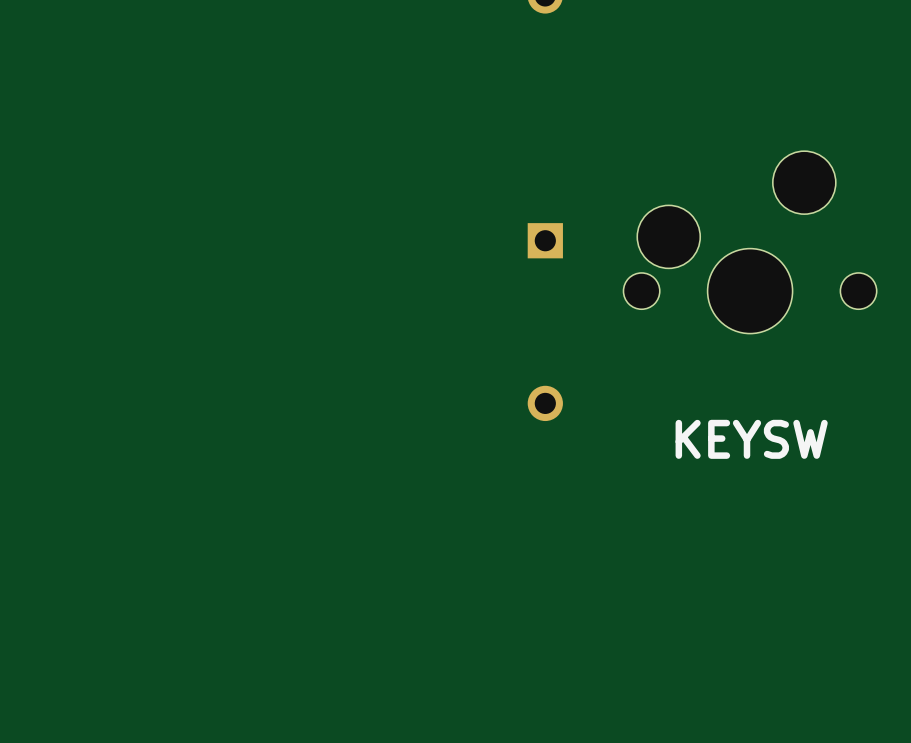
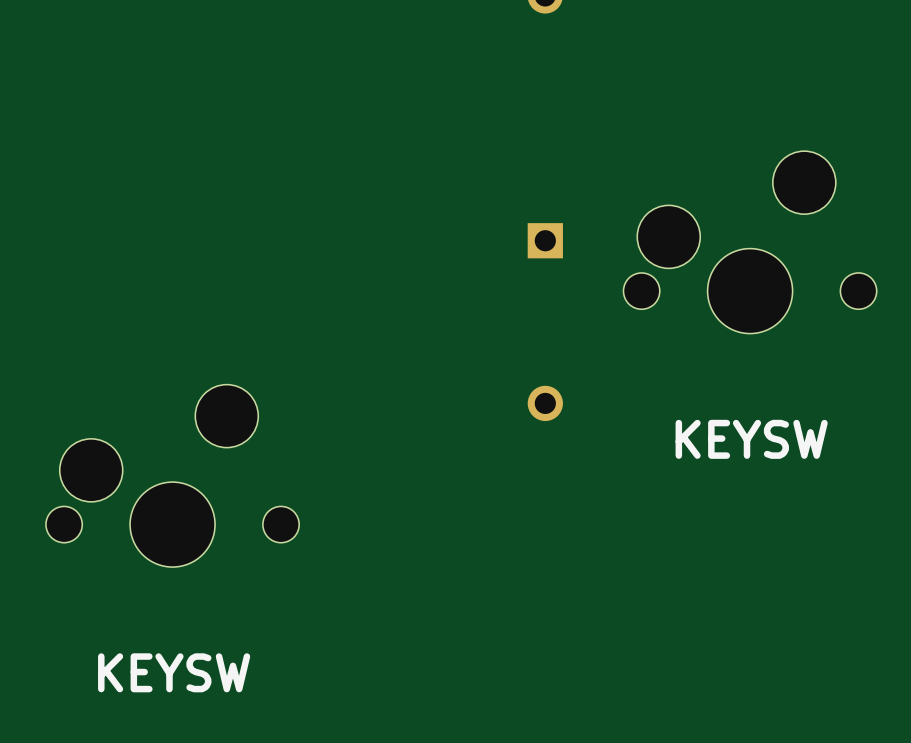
part: none -> KEYSW (172, 475)

